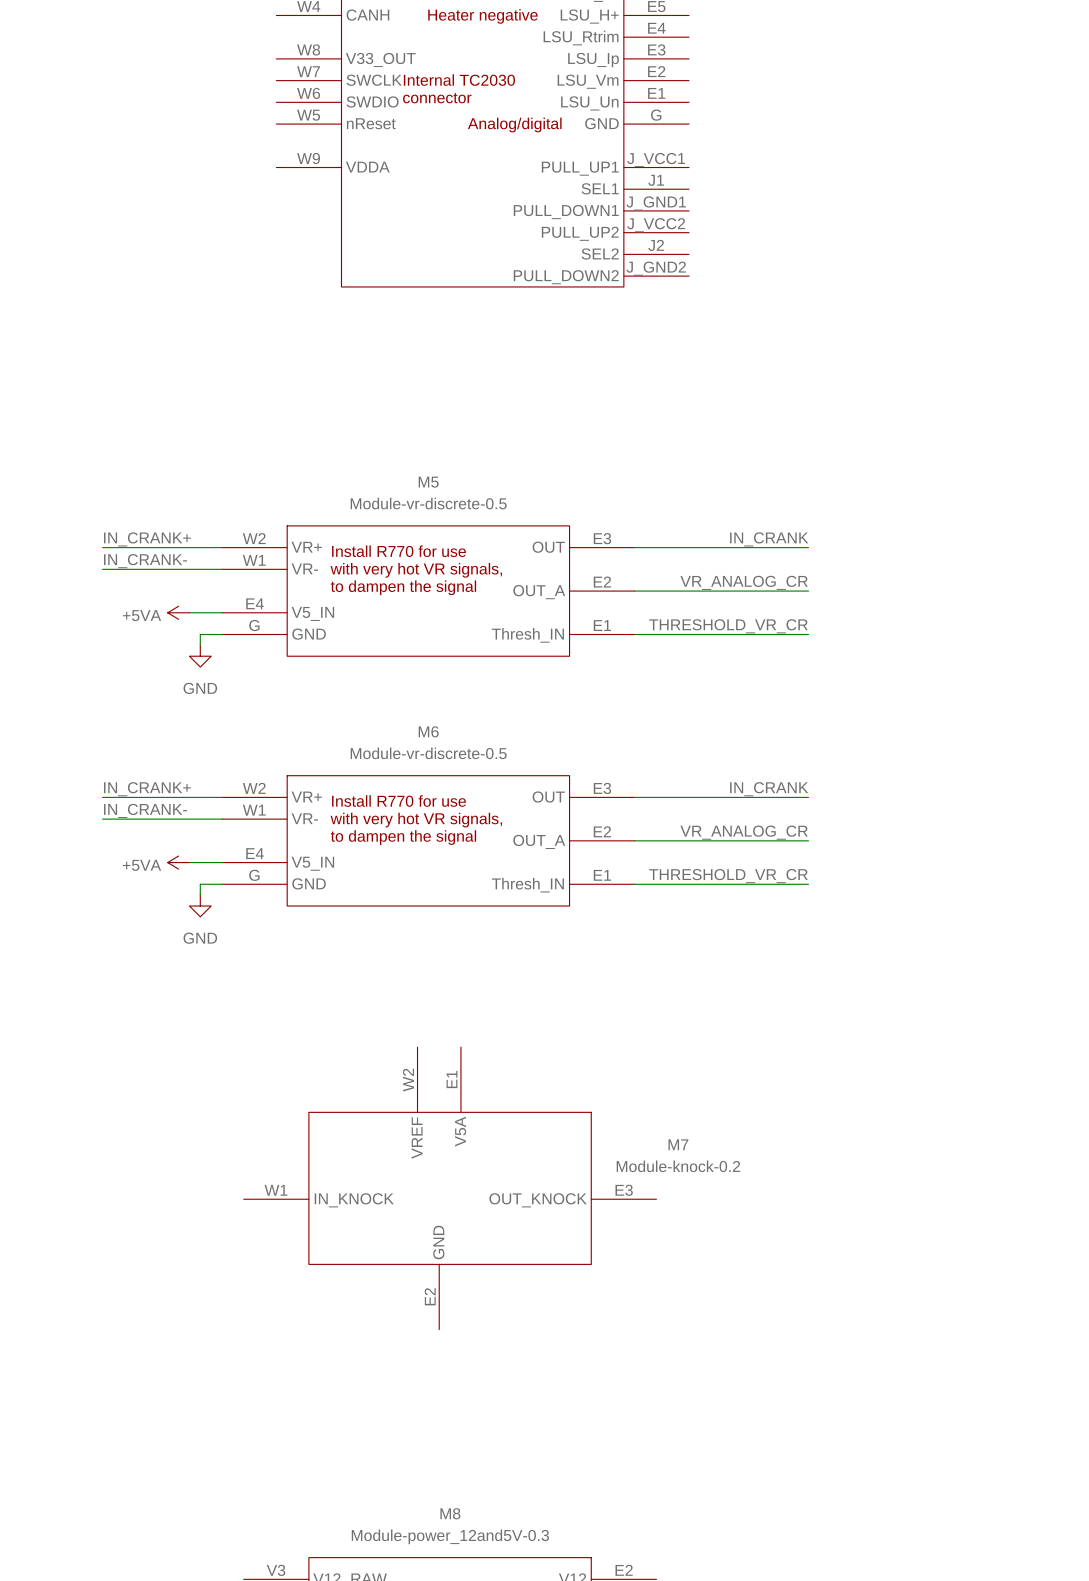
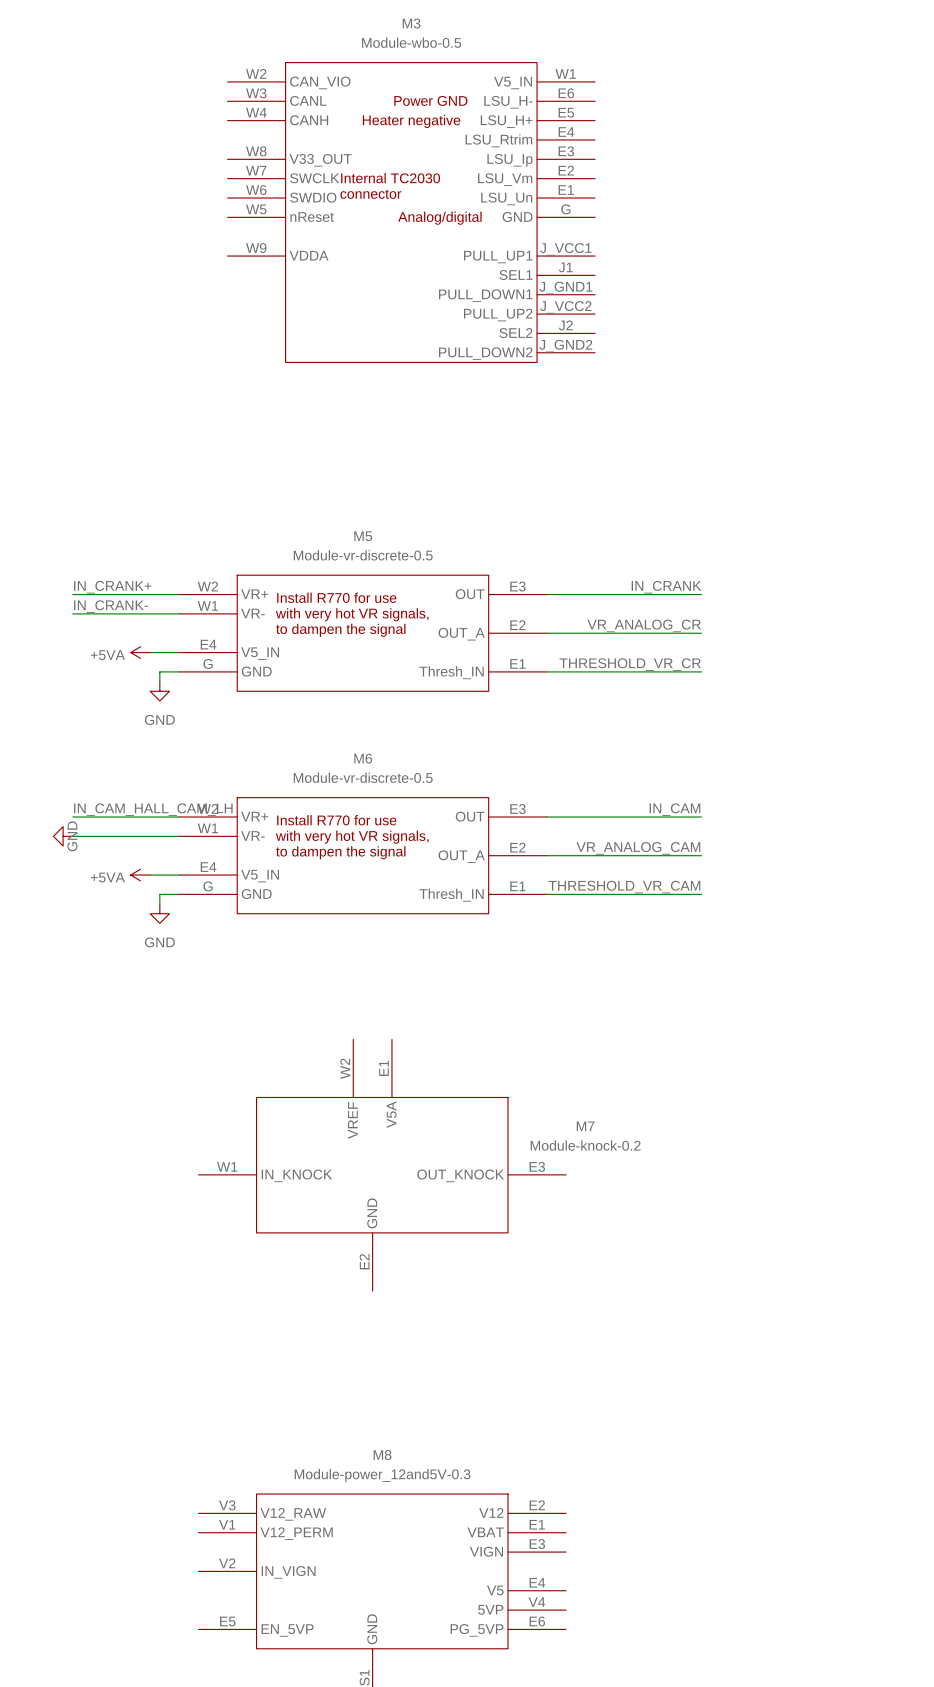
label: IN_CRANK+ (147, 789) -> IN_CAM_HALL_CAM_LH (153, 809)
label: IN_CRANK (769, 789) -> IN_CAM (674, 809)
label: IN_CRANK- (145, 810) -> none
power symbol: none -> GND (63, 836)
label: VR_ANALOG_CR (744, 832) -> VR_ANALOG_CAM (638, 848)
label: THRESHOLD_VR_CR (728, 876) -> THRESHOLD_VR_CAM (624, 887)

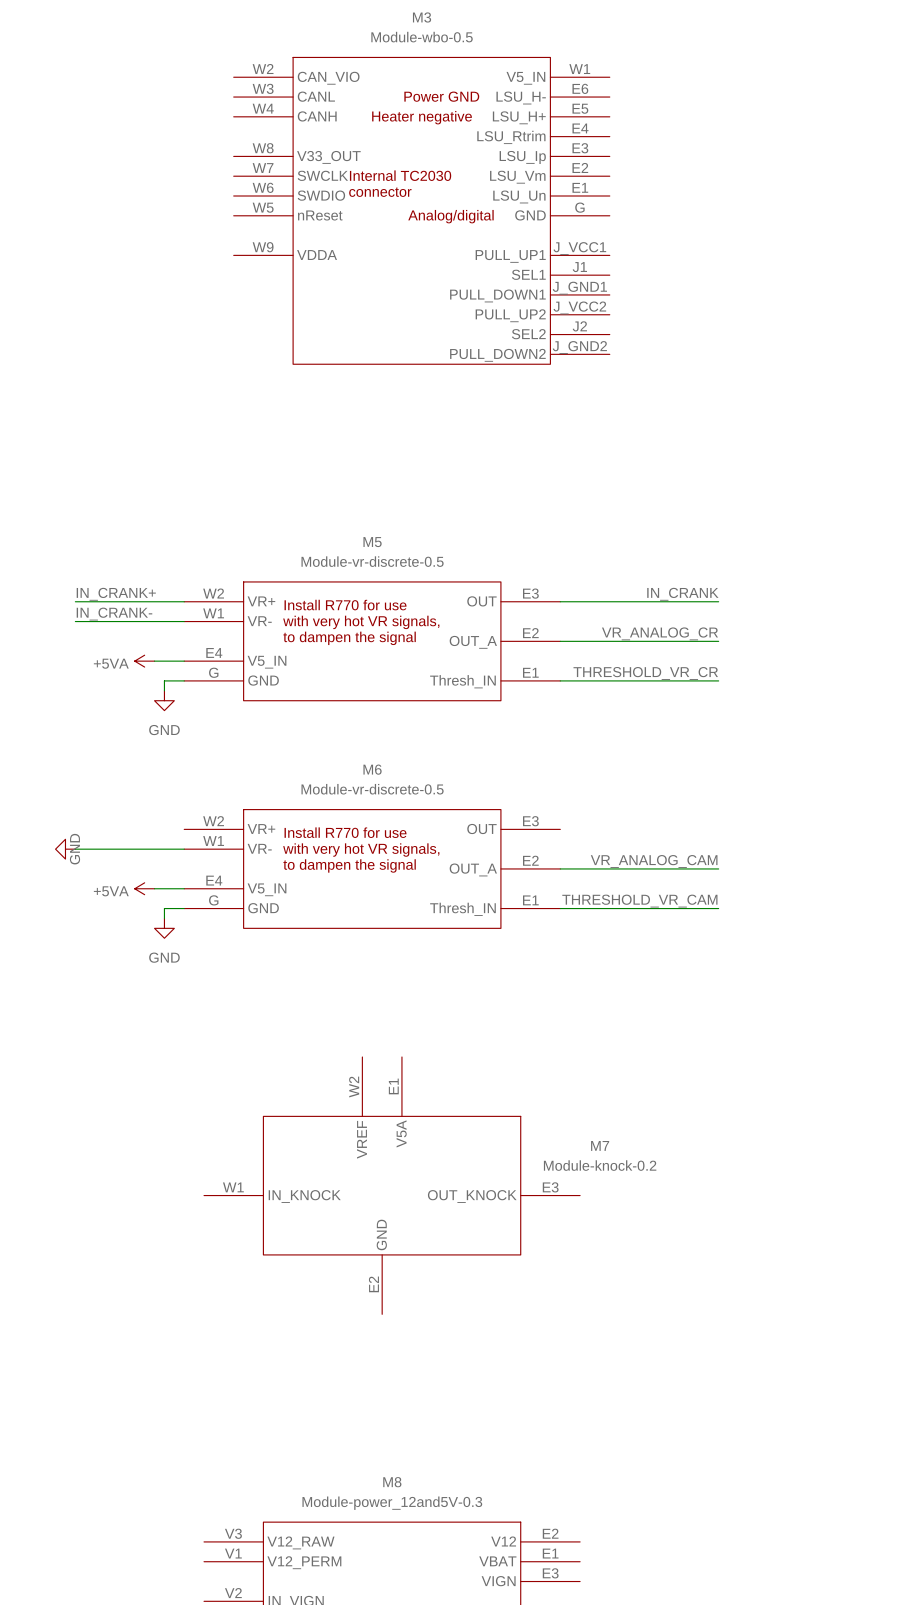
label: IN_CAM_HALL_CAM_LH (153, 809) -> none
label: IN_CAM (674, 809) -> none
wire: (72, 817) (179, 817) -> none
wire: (546, 817) (701, 817) -> none

